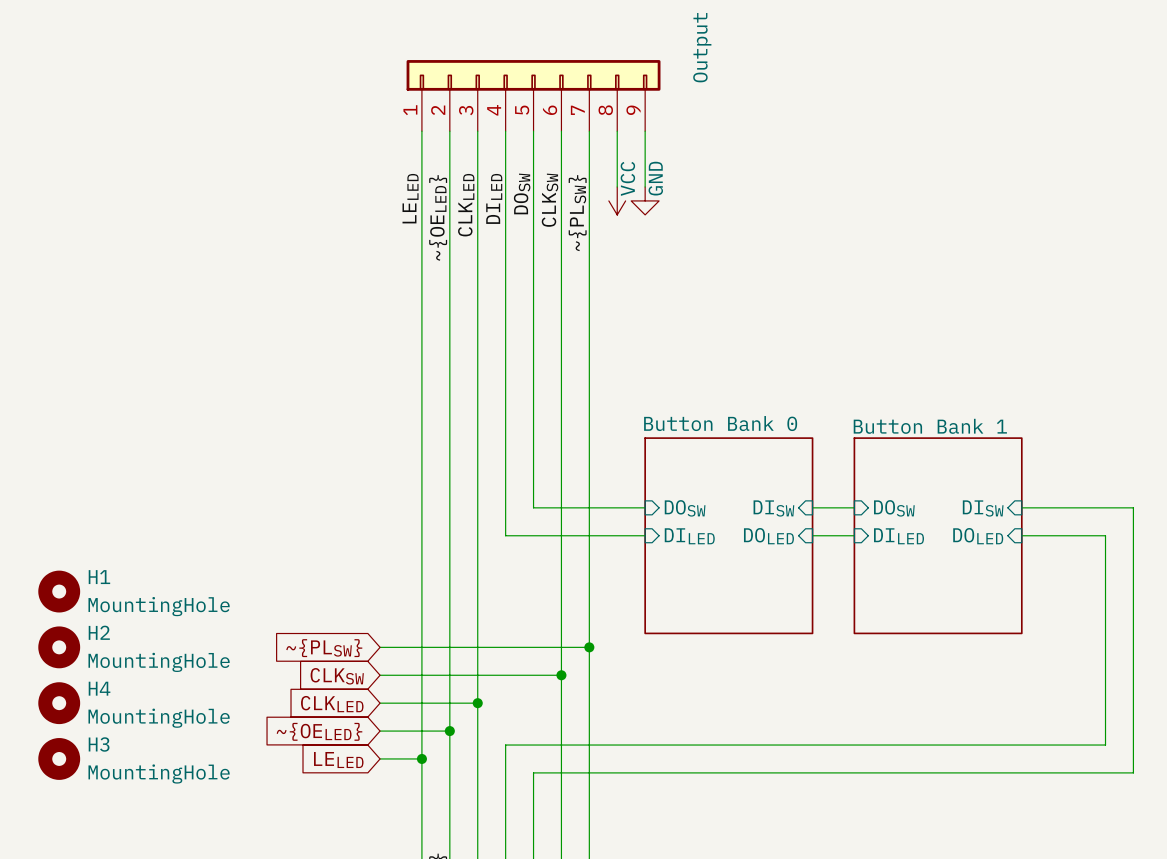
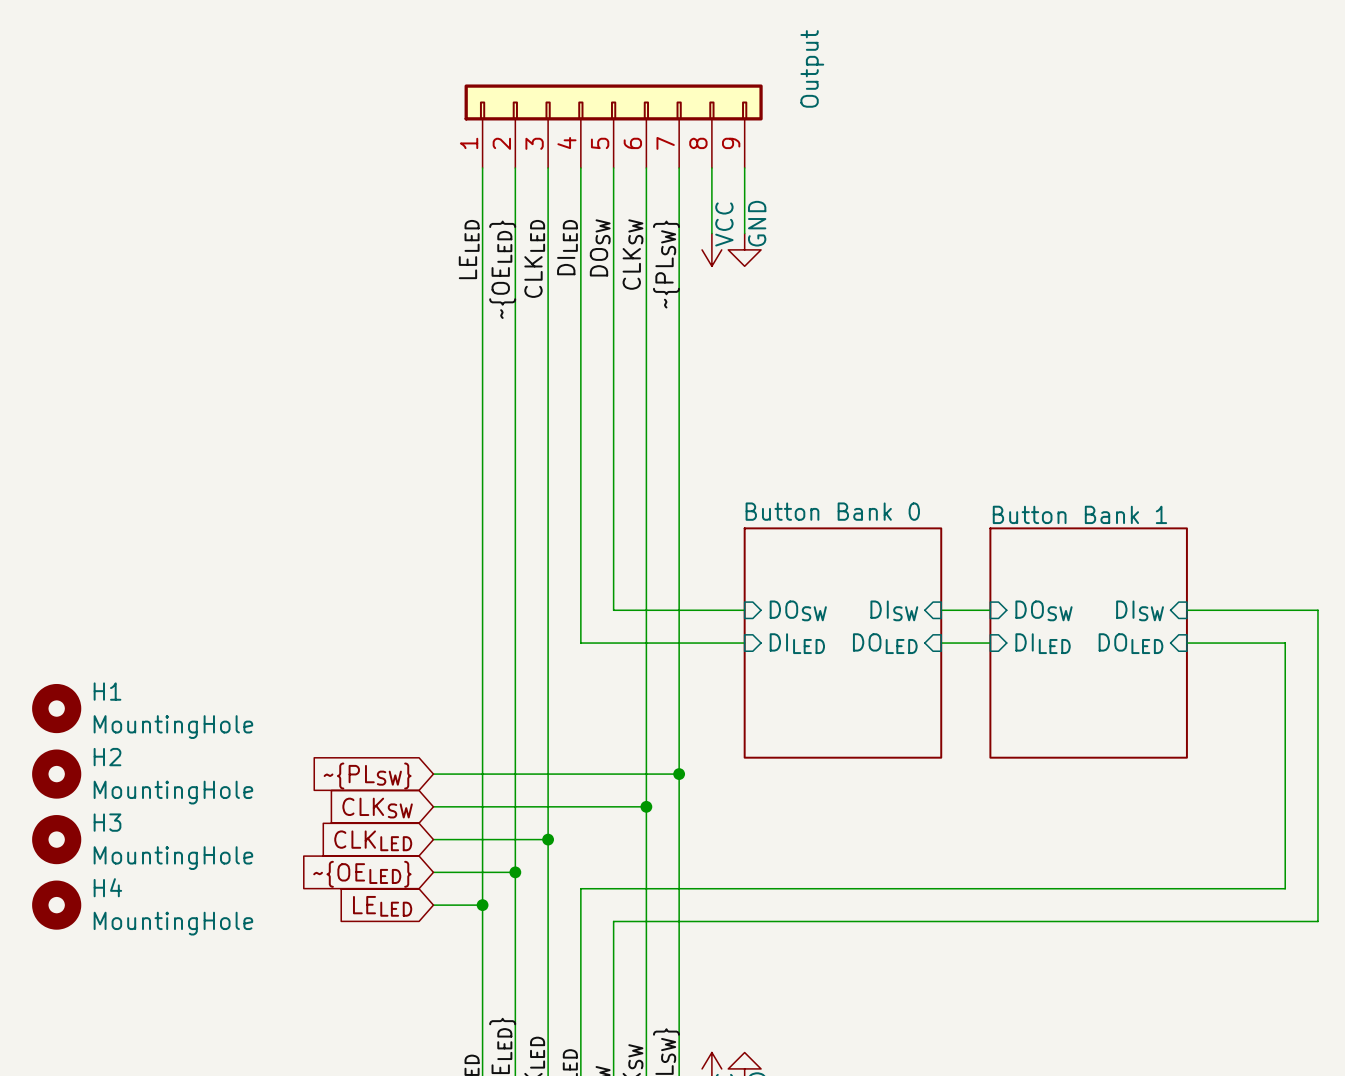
H4 name: H4 (99, 688) -> H3 (107, 822)
H3 name: H3 (99, 744) -> H4 (107, 887)

